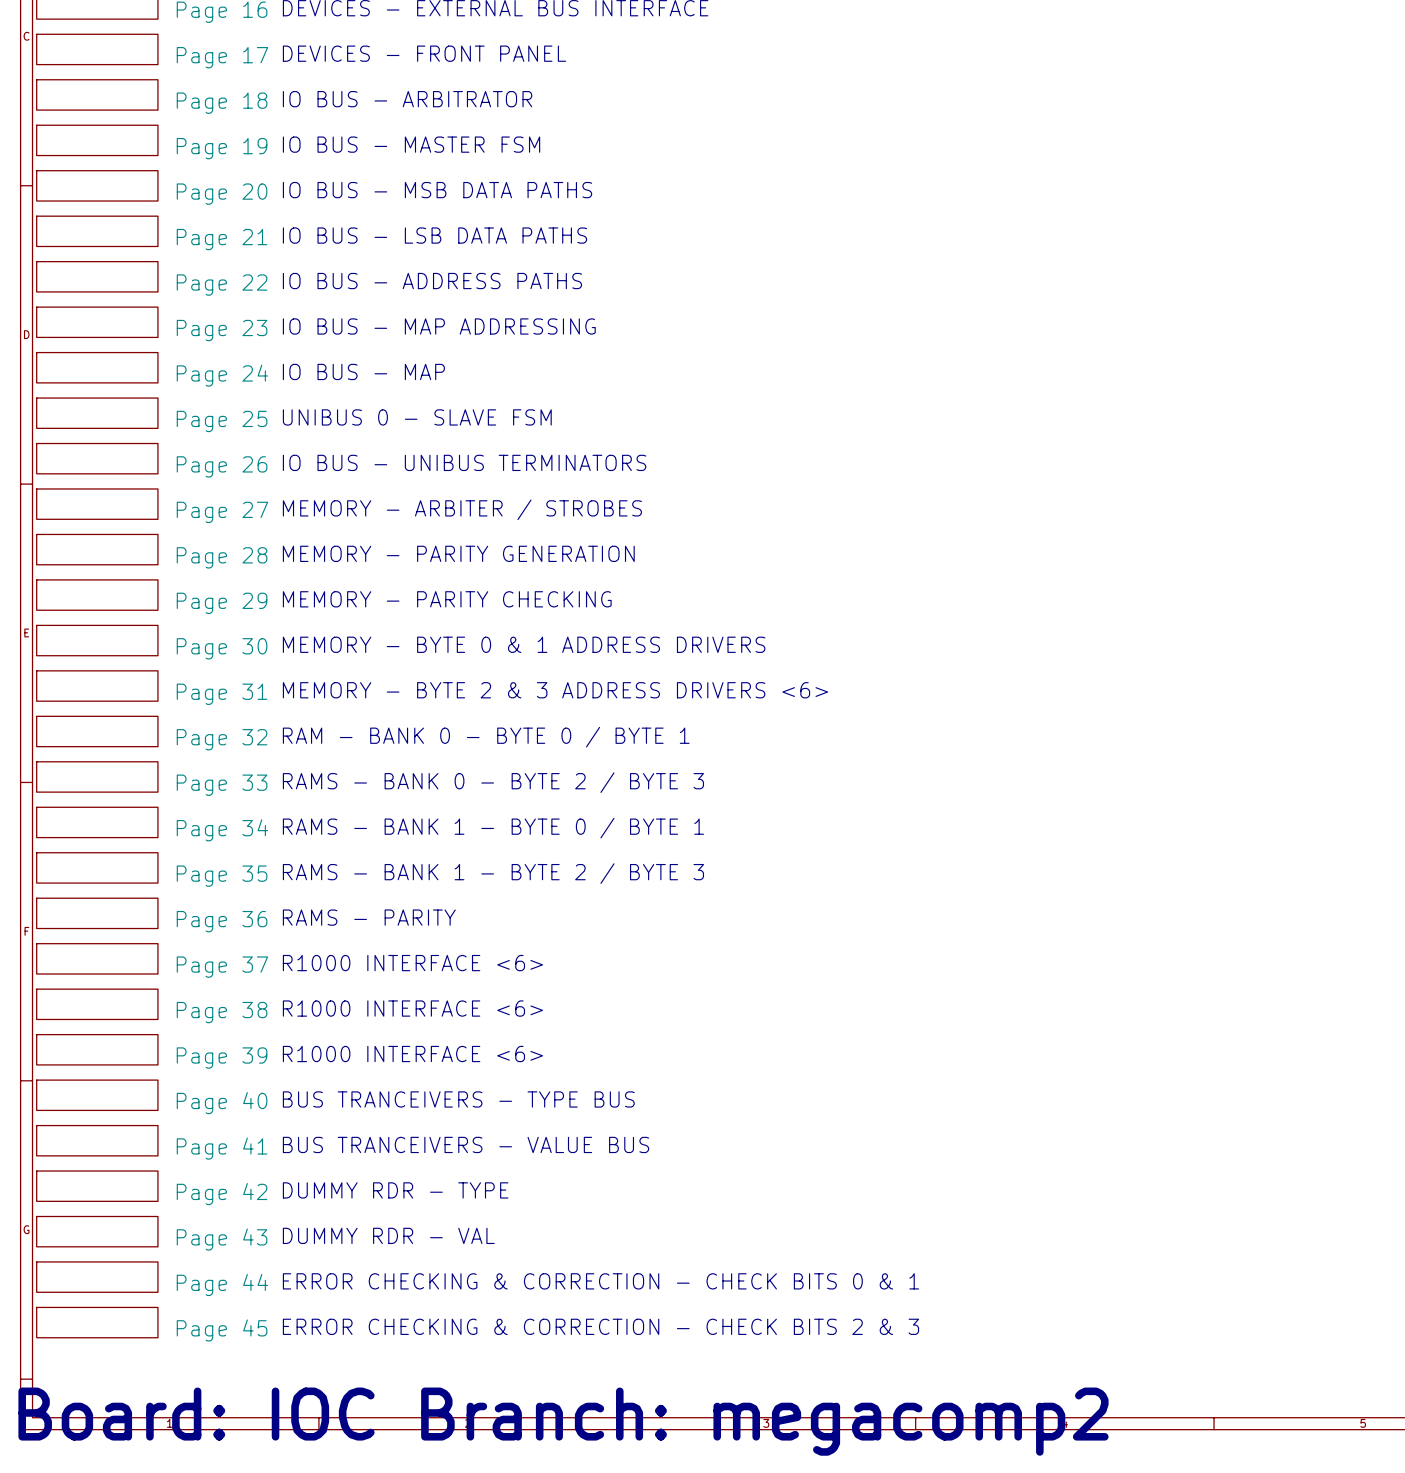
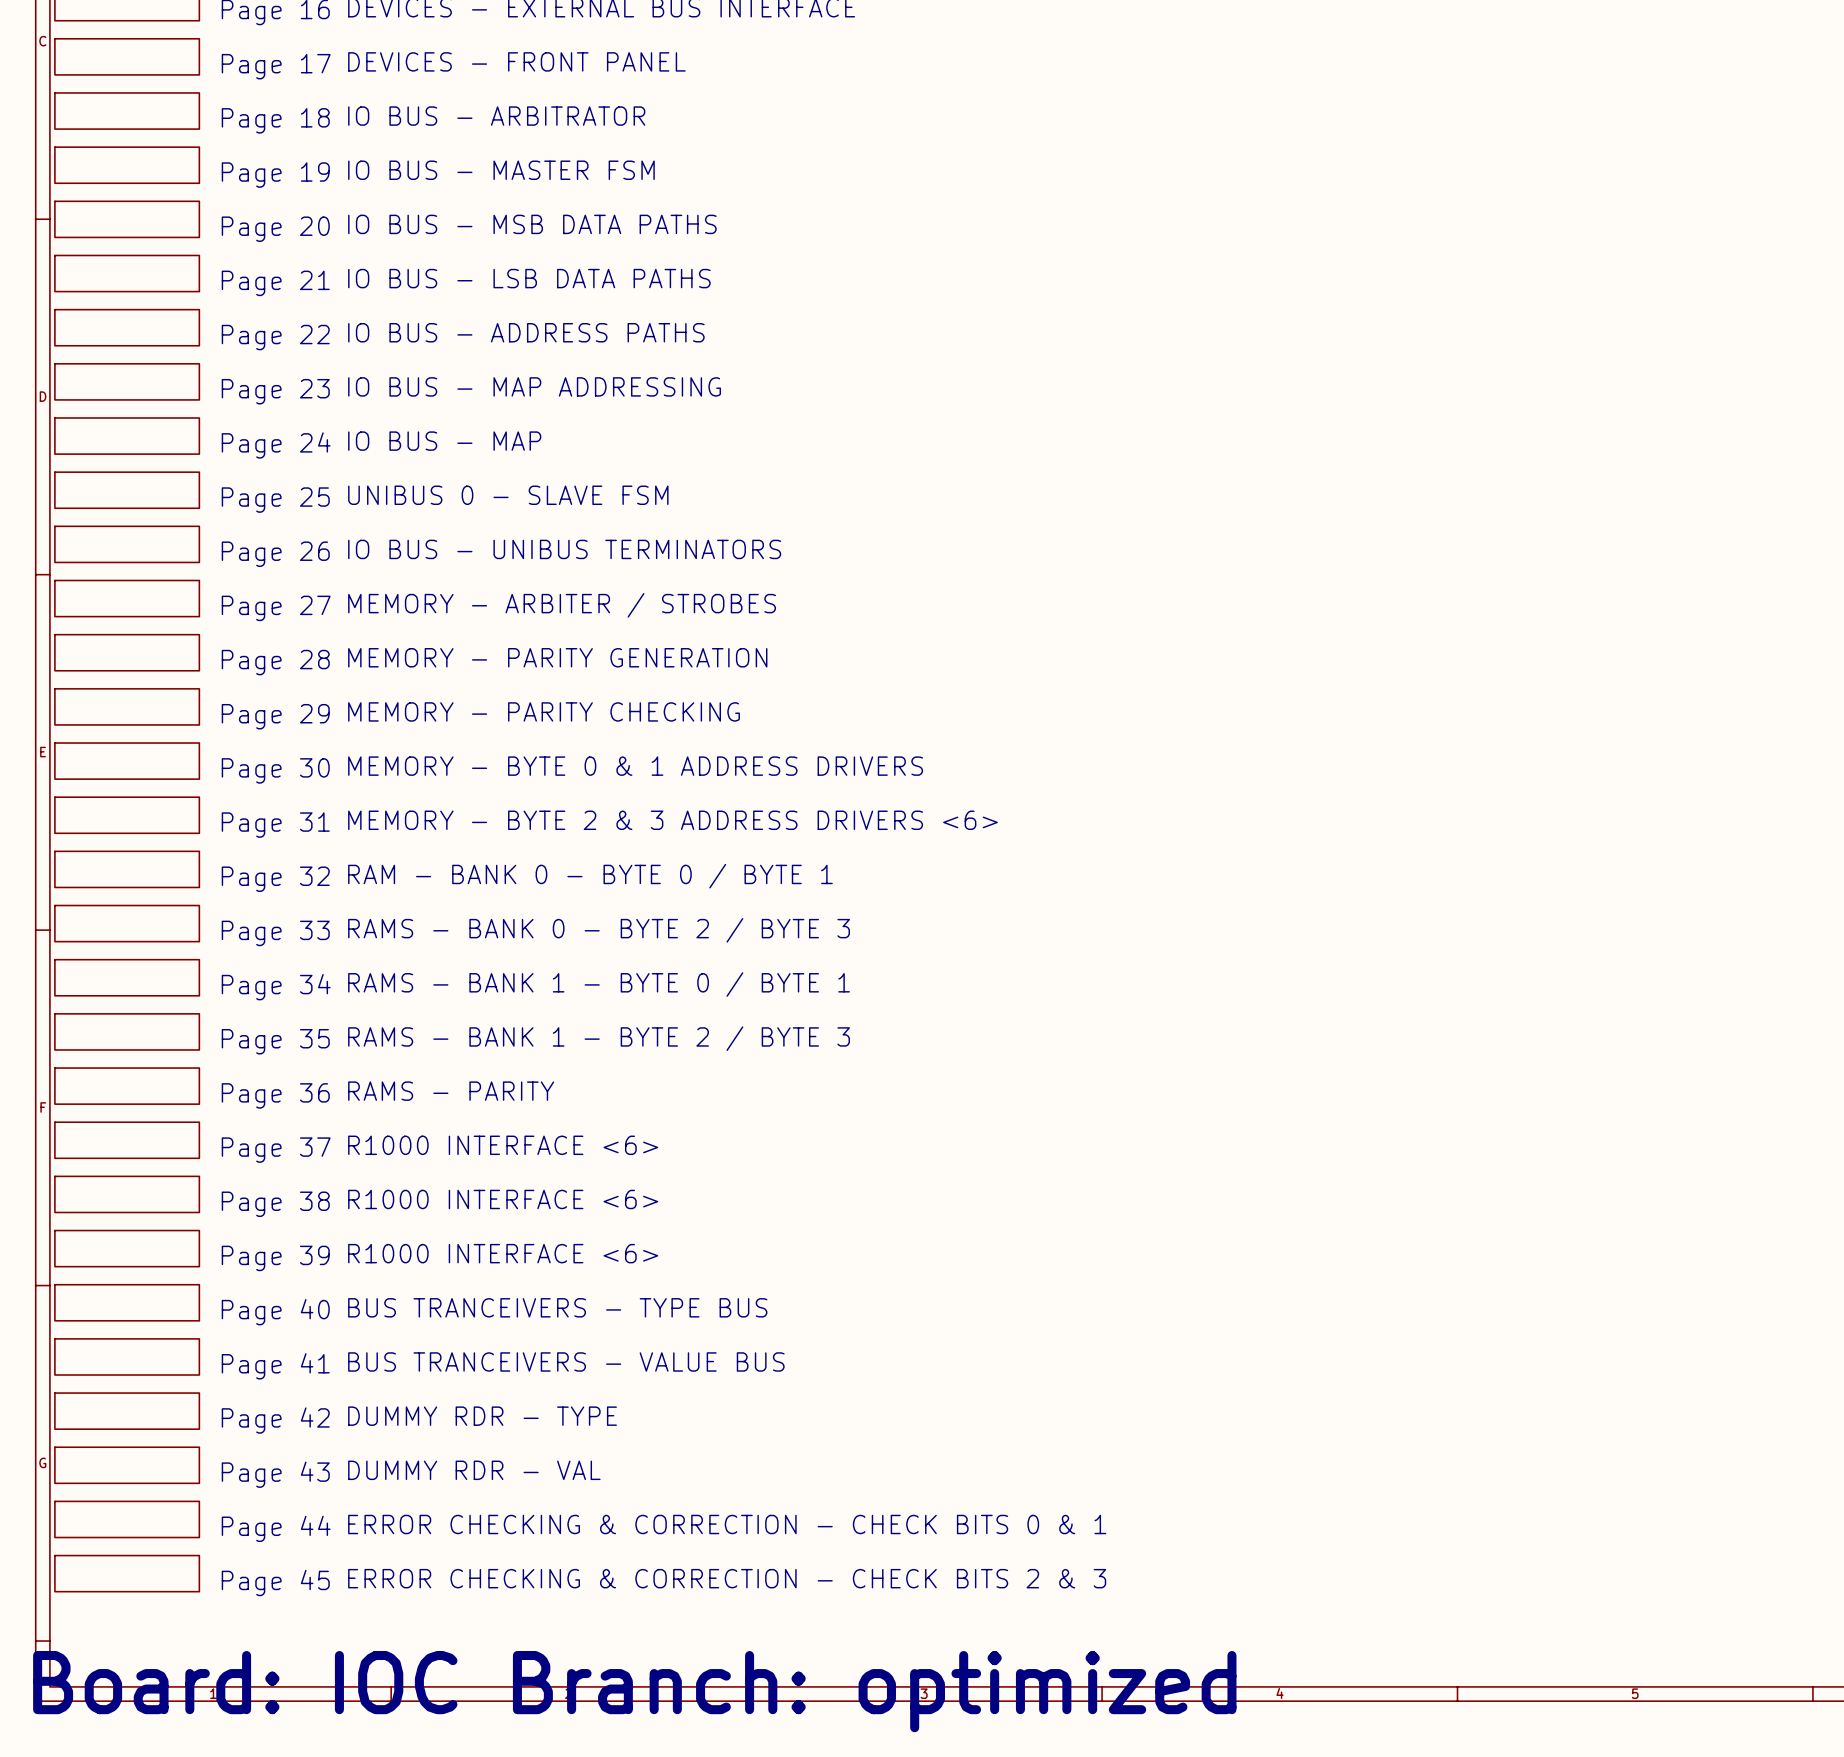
text: Board: IOC Branch: megacomp2 (563, 1421) -> Board: IOC Branch: optimized (634, 1691)

